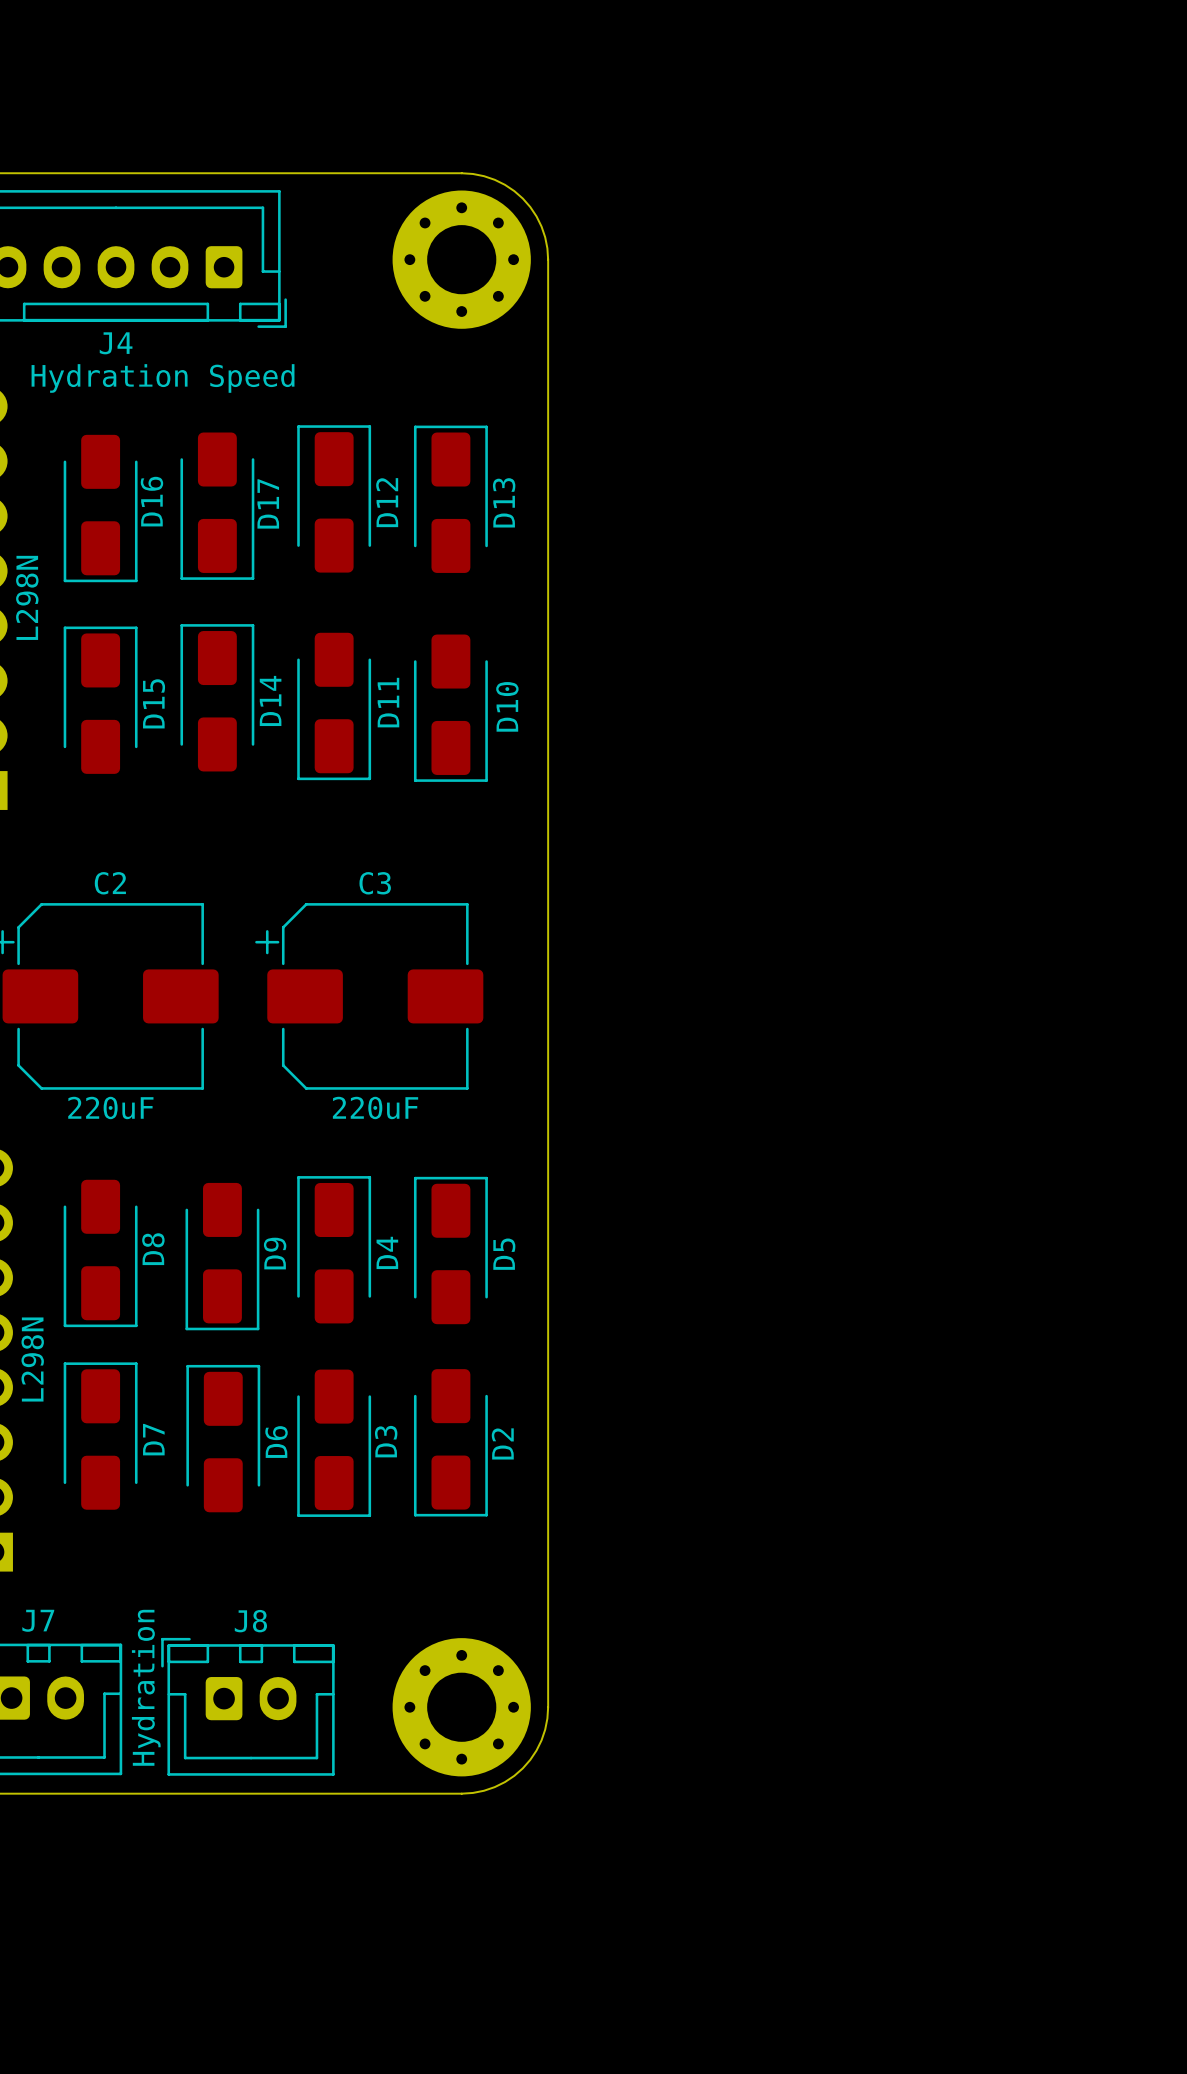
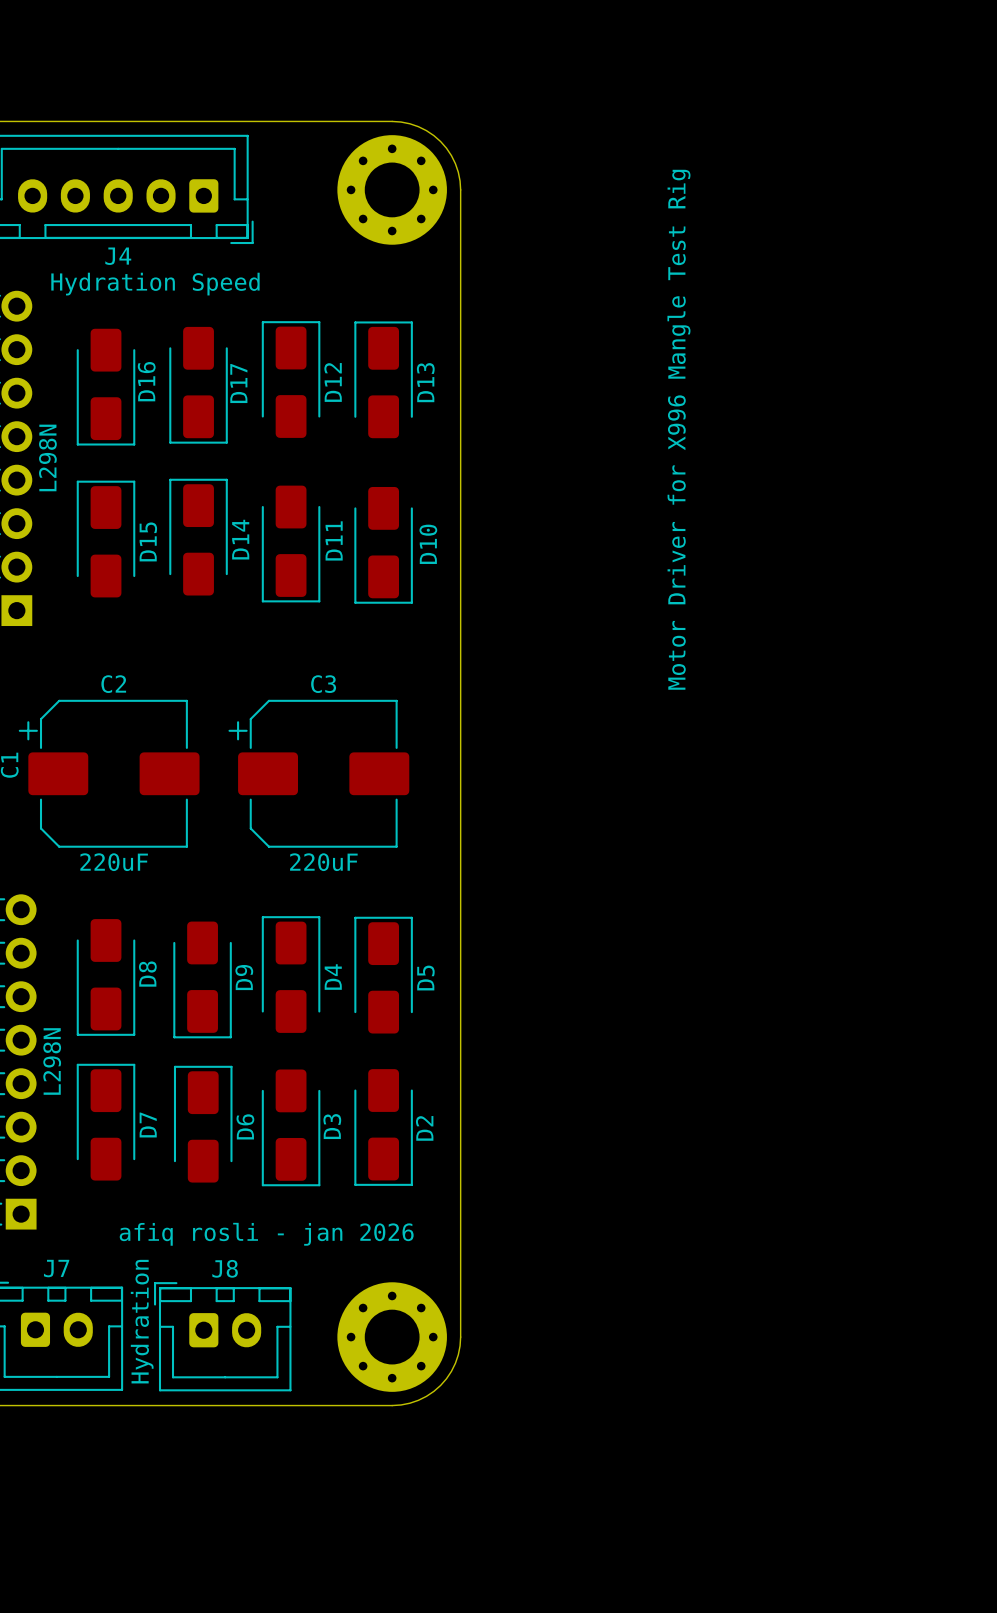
text: none -> Motor Driver for X996 Mangle Test Rig (678, 429)
text: none -> afiq rosli - jan 2026 (266, 1234)

